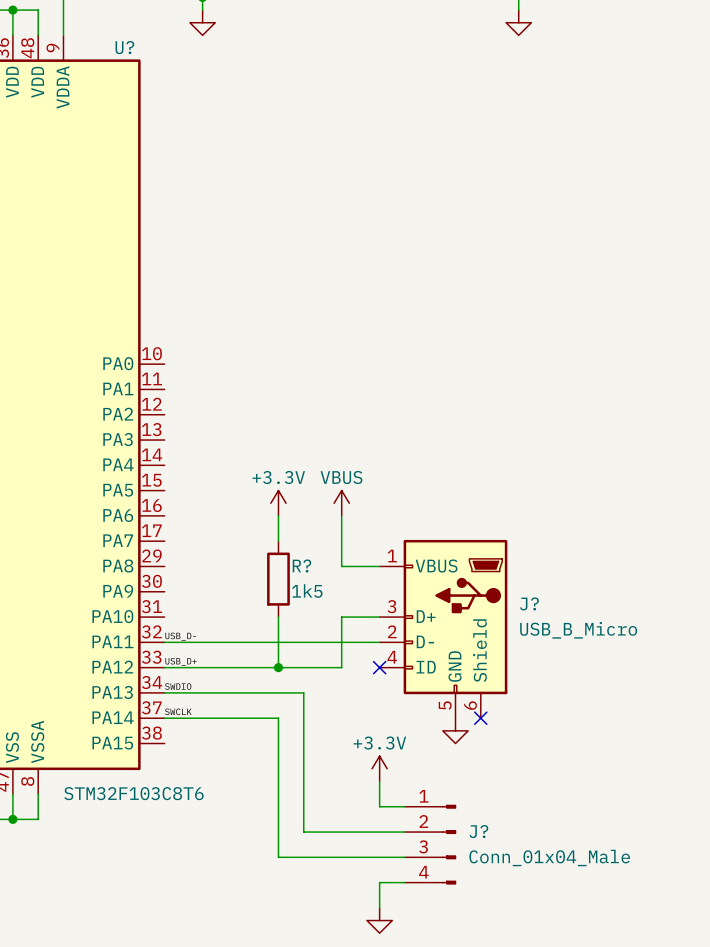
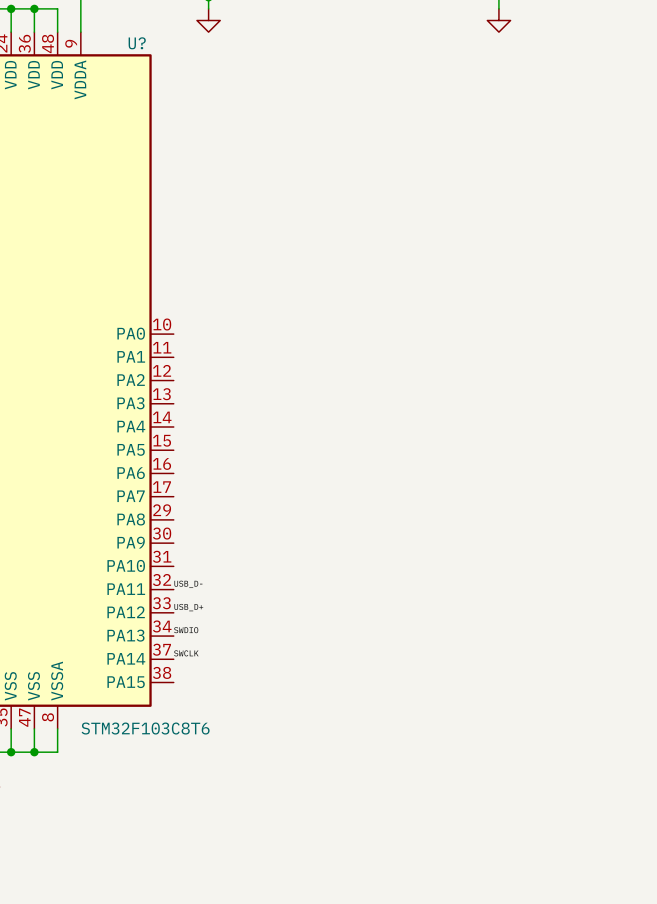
power symbol: +3.3V (278, 503) -> none
power symbol: VBUS (341, 503) -> none
wire: (278, 515) (278, 541) -> none
wire: (341, 515) (341, 566) (379, 566) -> none
R?: 1k5 (278, 579) -> none
wire: (278, 617) (278, 667) -> none
wire: (379, 617) (341, 617) (341, 667) (164, 667) -> none
J?: USB_B_Micro (443, 629) -> none
wire: (164, 642) (379, 642) -> none
junction: (278, 667) -> none
no-connect mark: (379, 667) -> none
wire: (164, 692) (303, 692) (303, 832) (404, 832) -> none
wire: (164, 718) (278, 718) (278, 857) (404, 857) -> none
no-connect mark: (480, 718) -> none
power symbol: (455, 730) -> none
power symbol: +3.3V (379, 768) -> none
wire: (379, 781) (379, 806) (404, 806) -> none
J?: Conn_01x04_Male (430, 844) -> none
wire: (404, 882) (379, 882) (379, 907) -> none
power symbol: (379, 920) -> none

